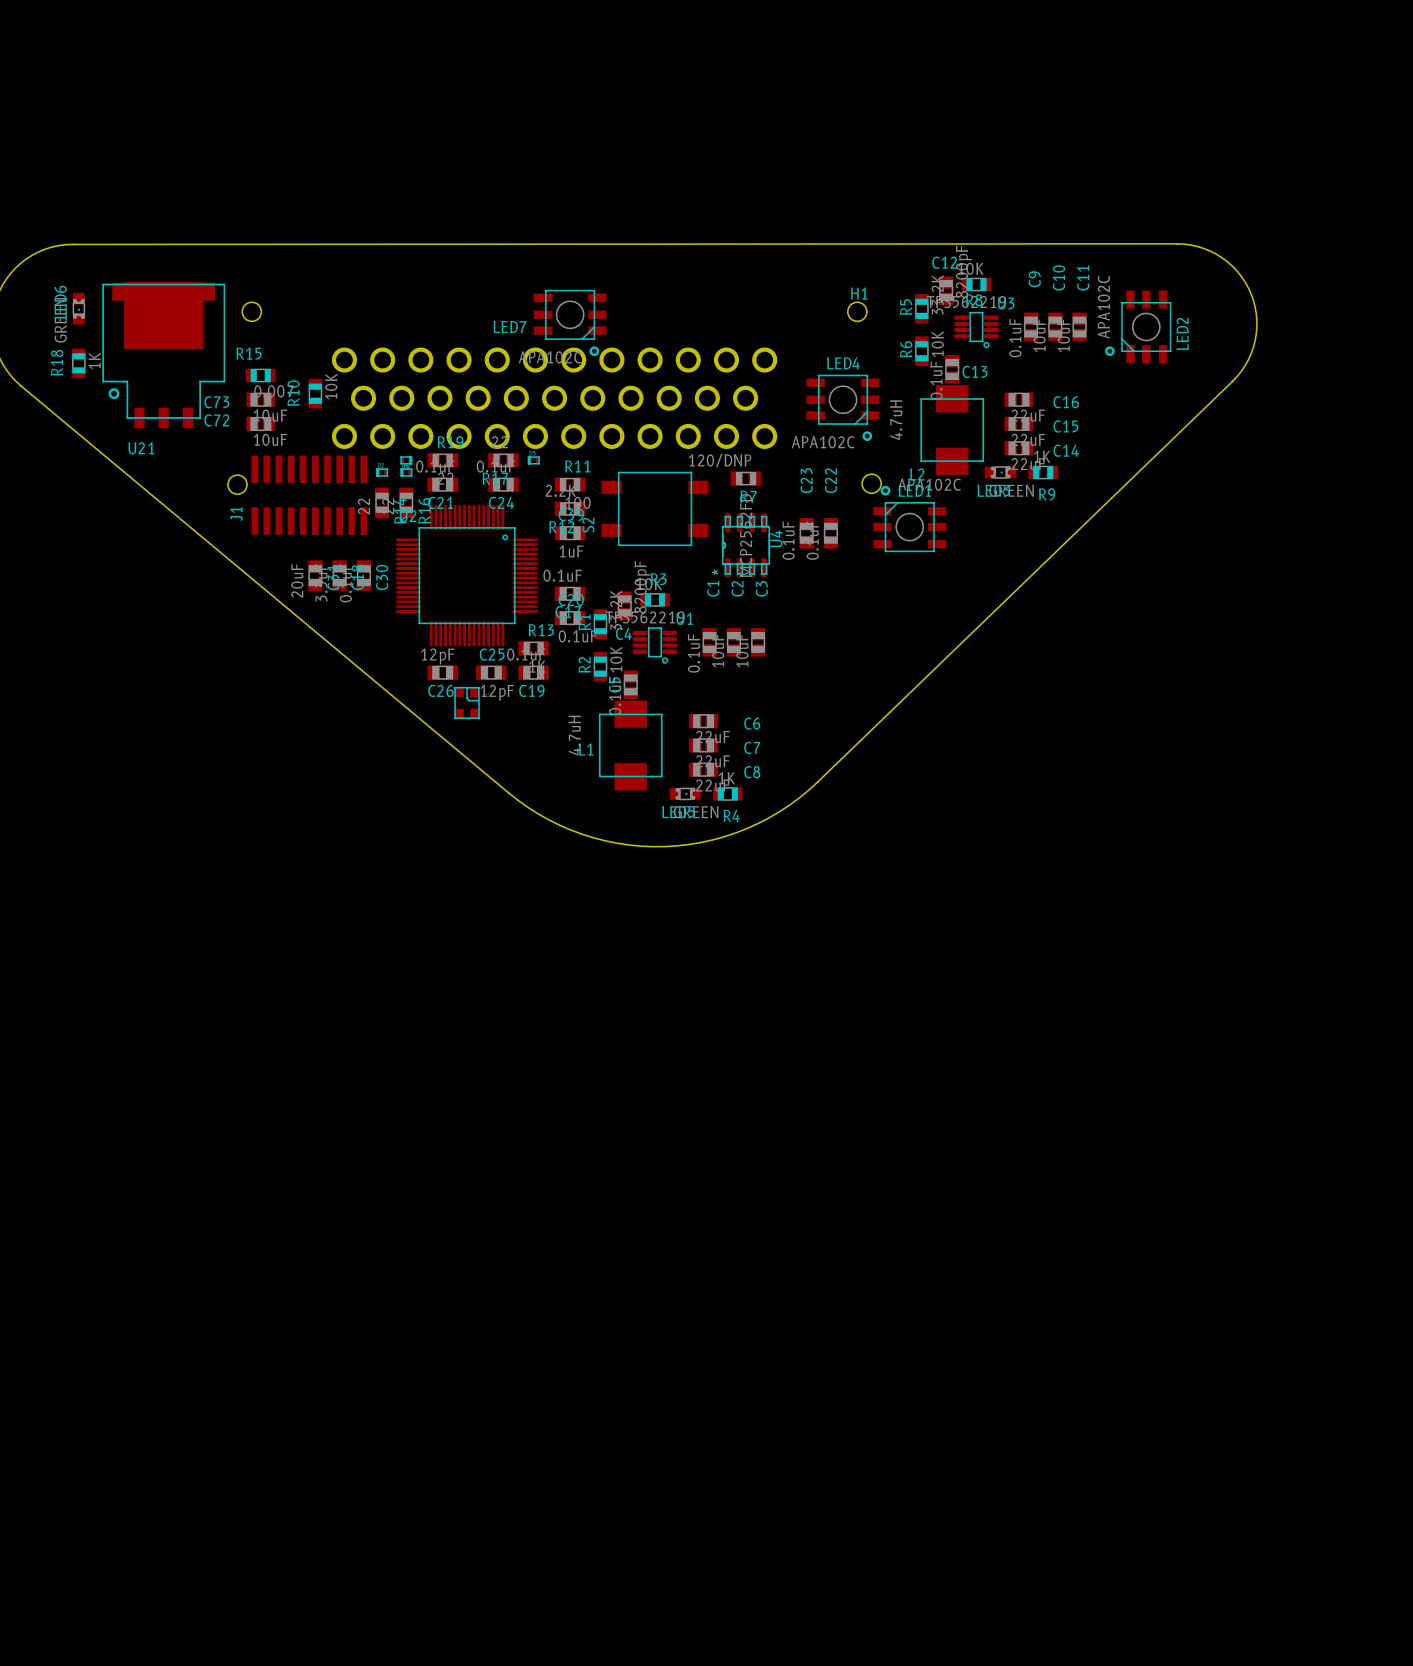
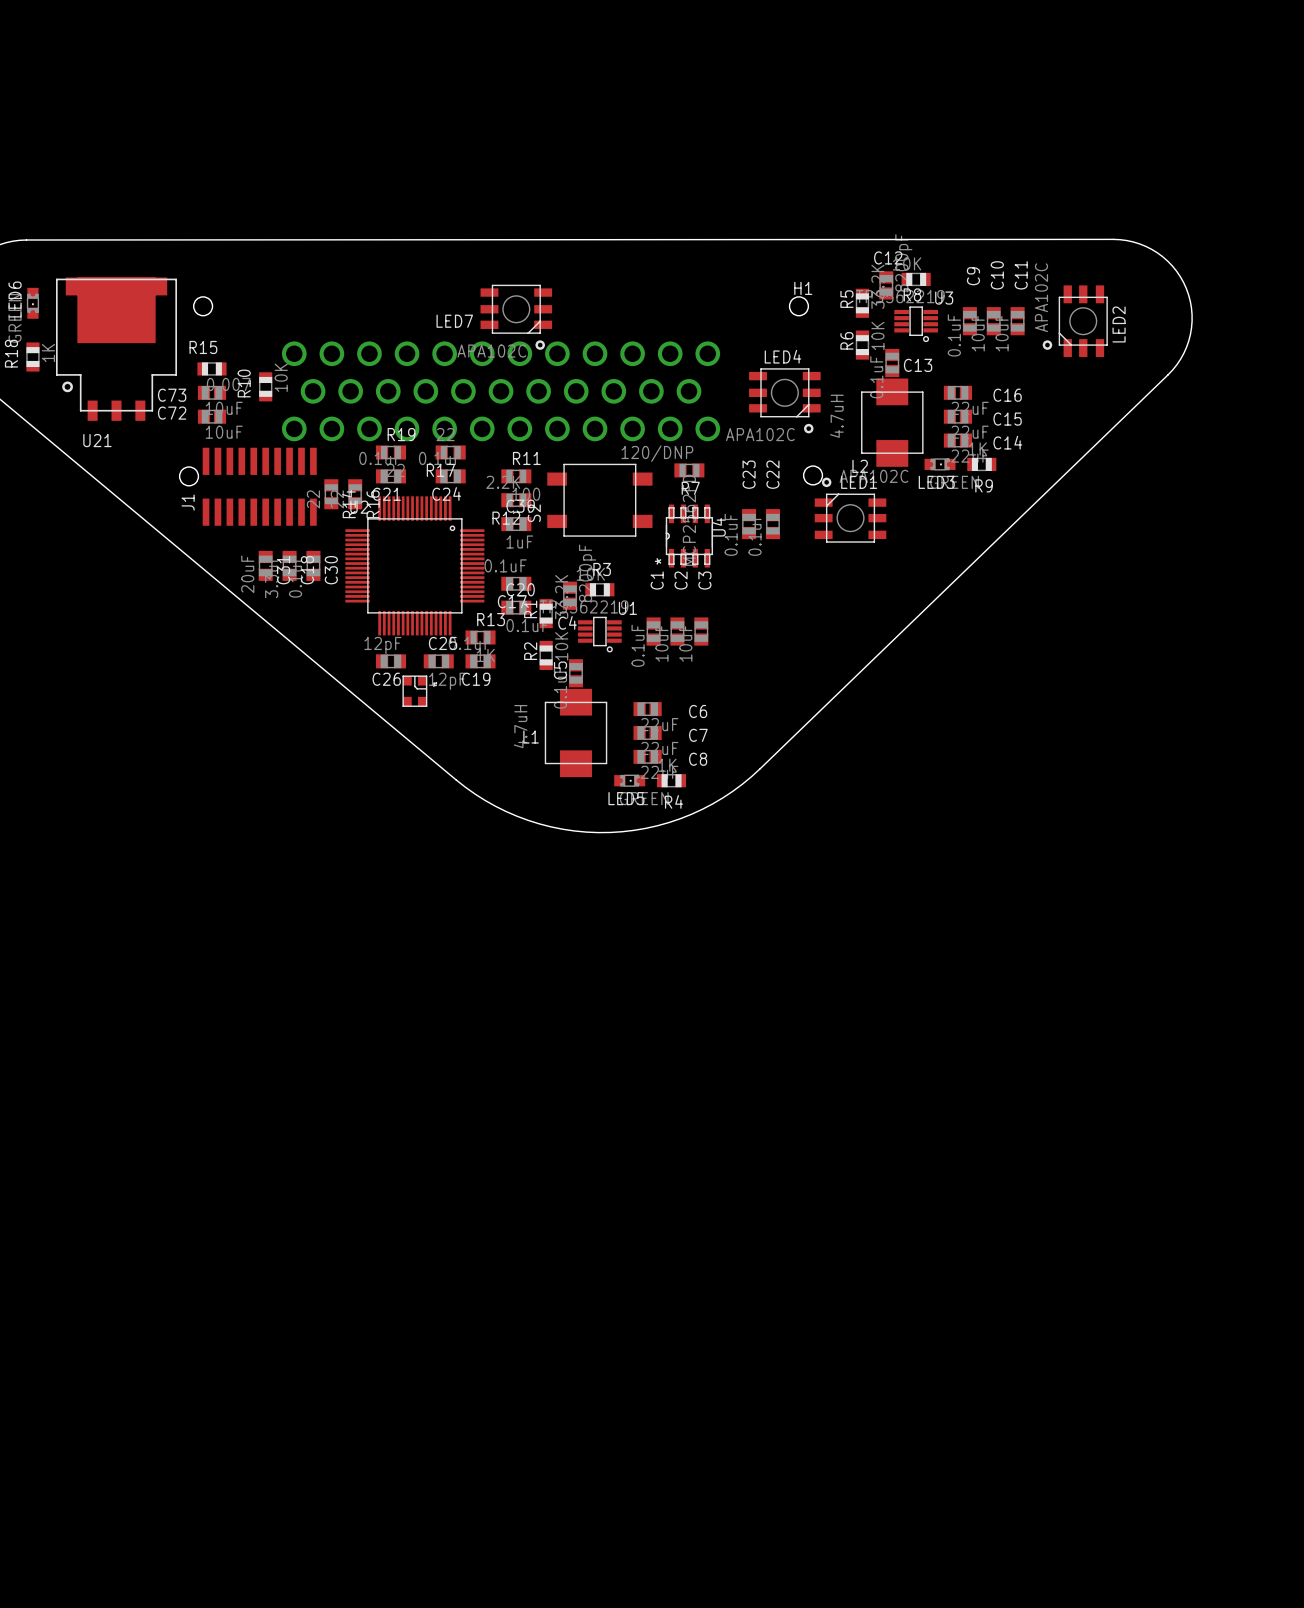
part: (406, 460) -> none
part: (533, 460) -> none
part: (382, 472) -> none
part: (406, 472) -> none

